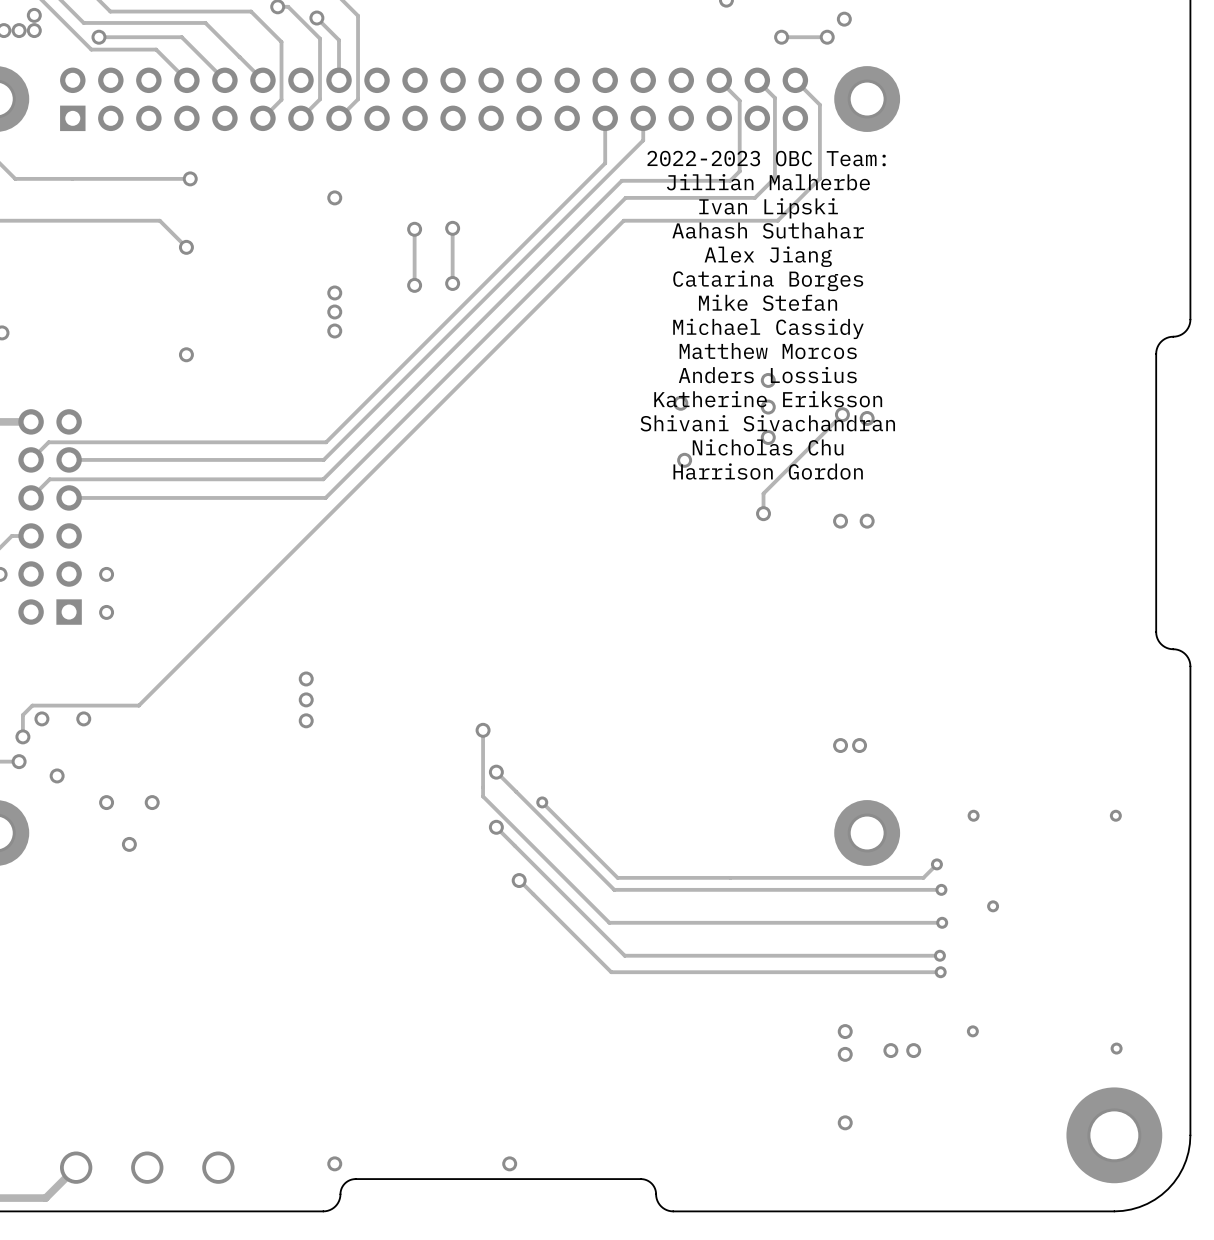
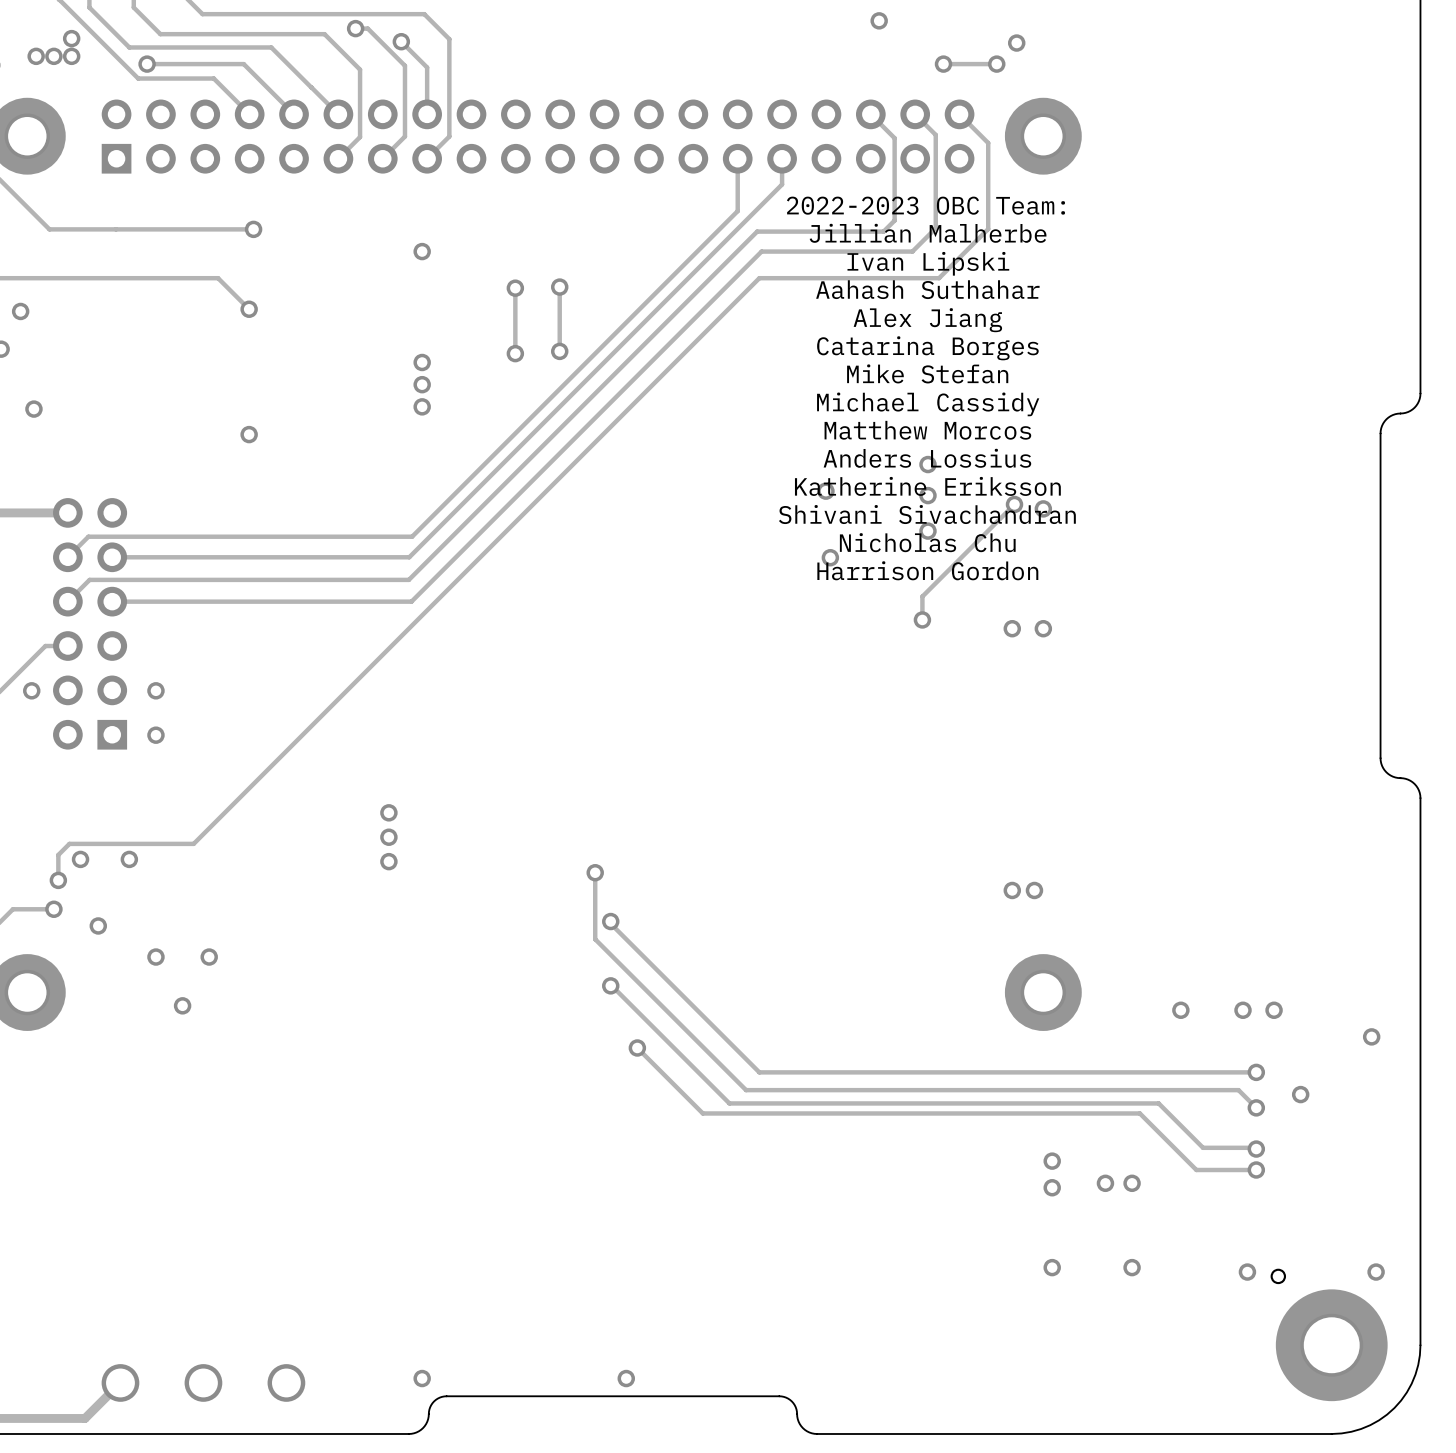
track: (496, 772) (614, 889) (941, 889) -> none
track: none -> (610, 923) (759, 1072) (1256, 1072)
track: (483, 787) (483, 796) (609, 922) (942, 922) -> (595, 939) (746, 1090) (1238, 1090) (1256, 1107)
track: (542, 802) (617, 877) (923, 877) (936, 864) -> none
via: (542, 802) -> none
via: (973, 815) -> none
via: (1115, 815) -> none
track: (496, 827) (624, 955) (939, 955) -> none
track: none -> (611, 985) (729, 1103) (1158, 1103) (1203, 1147) (1256, 1149)
via: none -> (1180, 1010)
via: none -> (1243, 1010)
via: none -> (1274, 1010)
via: (936, 864) -> none
via: none -> (1371, 1036)
track: (519, 880) (611, 972) (940, 972) -> (637, 1047) (702, 1113) (1139, 1113) (1196, 1170) (1256, 1170)
via: (941, 889) -> none
via: none -> (1256, 1072)
via: (993, 906) -> none
via: none -> (1300, 1094)
via: (942, 922) -> none
via: none -> (1256, 1107)
via: (939, 955) -> none
via: none -> (1256, 1149)
via: (940, 972) -> none
via: none -> (1052, 1161)
via: none -> (1256, 1170)
via: none -> (1105, 1183)
via: none -> (1132, 1183)
via: none -> (1052, 1187)
via: (845, 1031) -> none
via: (972, 1031) -> none
via: (1116, 1048) -> none
via: (890, 1050) -> none
via: (913, 1050) -> none
via: (845, 1054) -> none
via: none -> (1052, 1267)
via: none -> (1132, 1267)
via: none -> (1247, 1272)
via: none -> (1376, 1272)
part: none -> (1278, 1276)
via: (845, 1122) -> none

